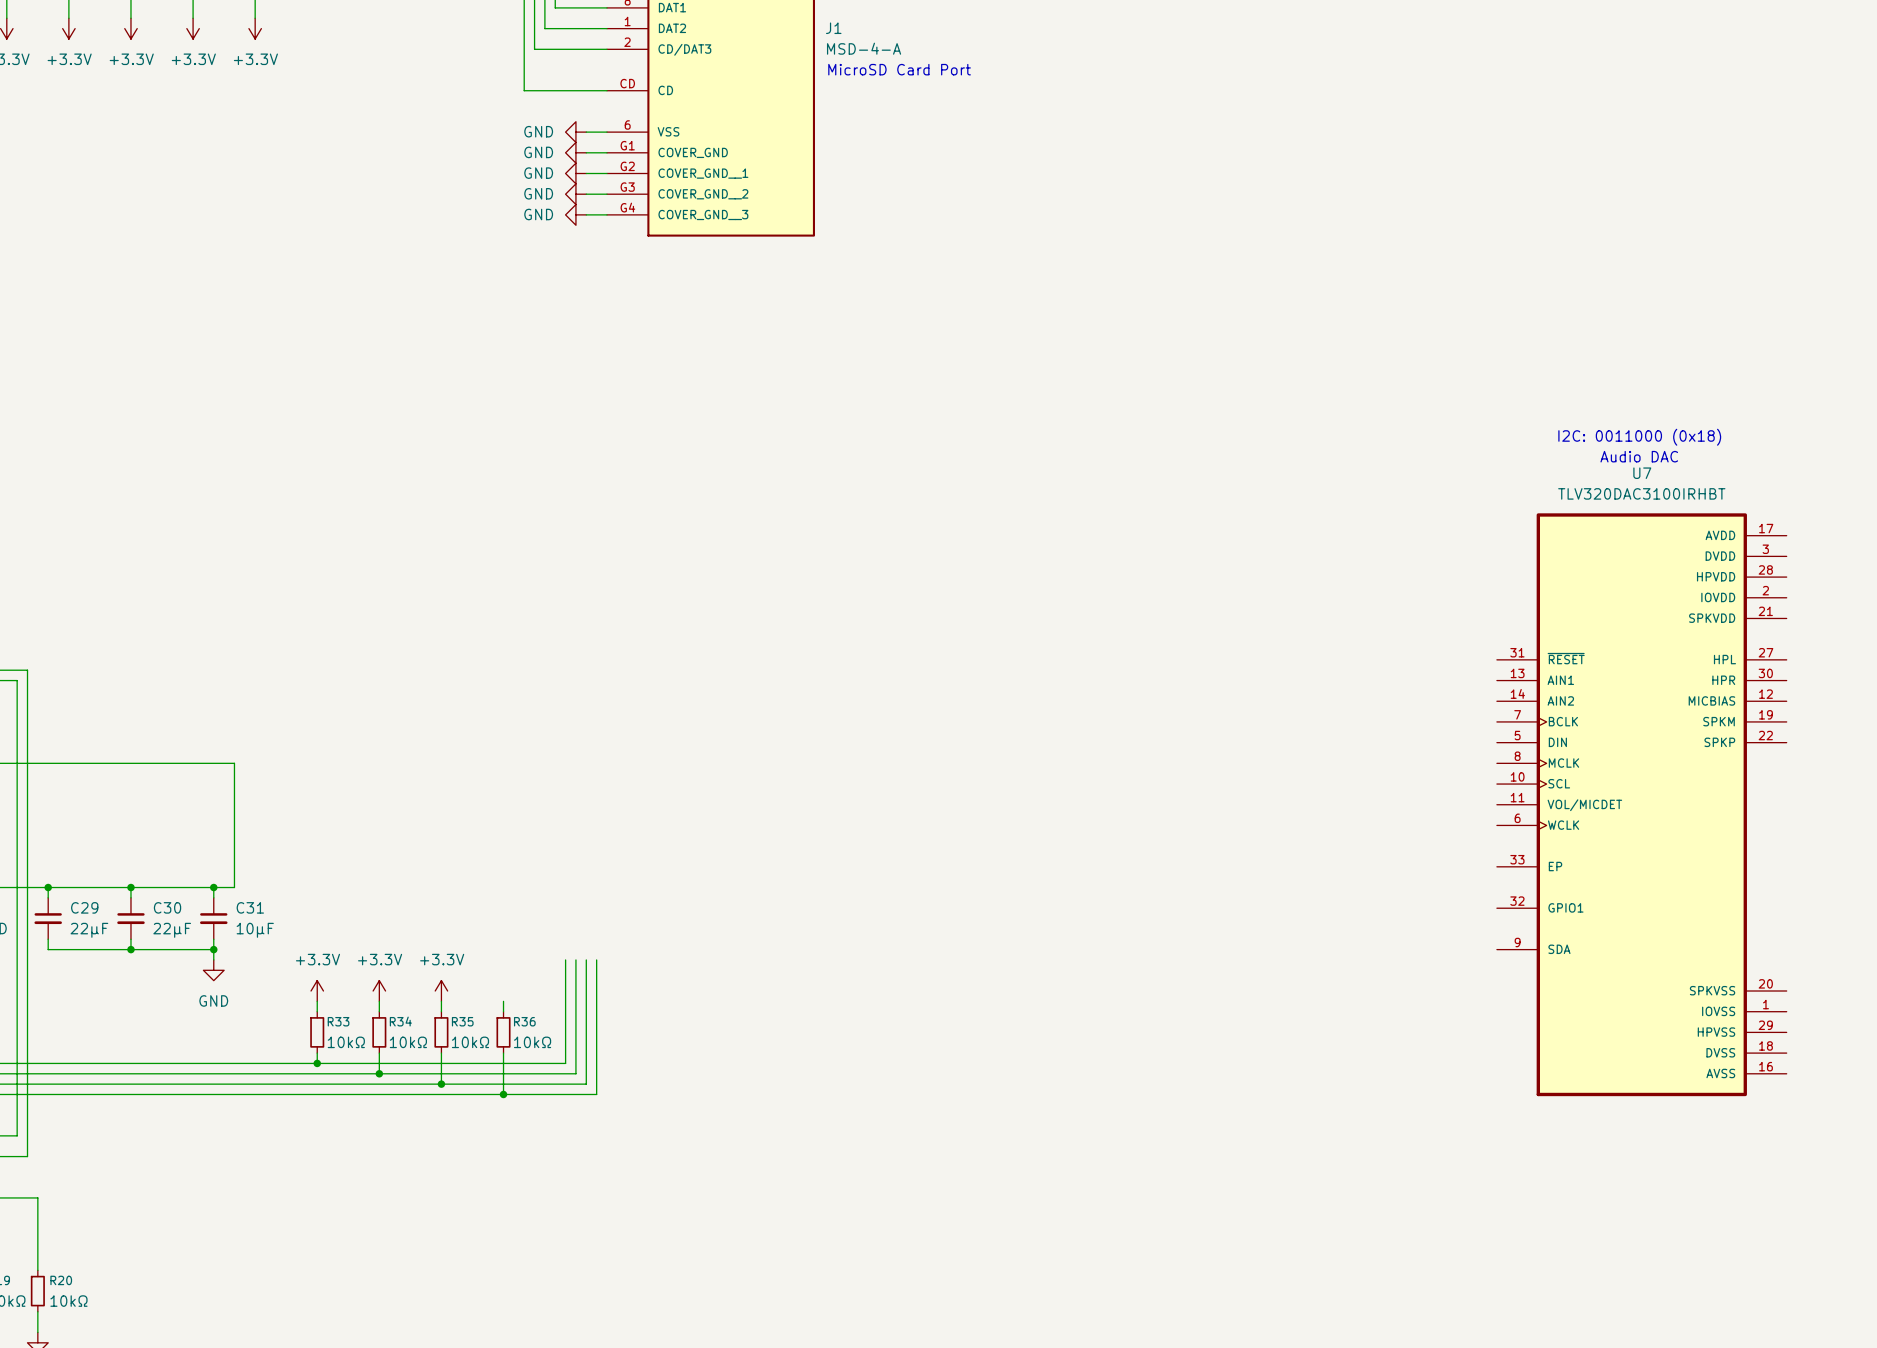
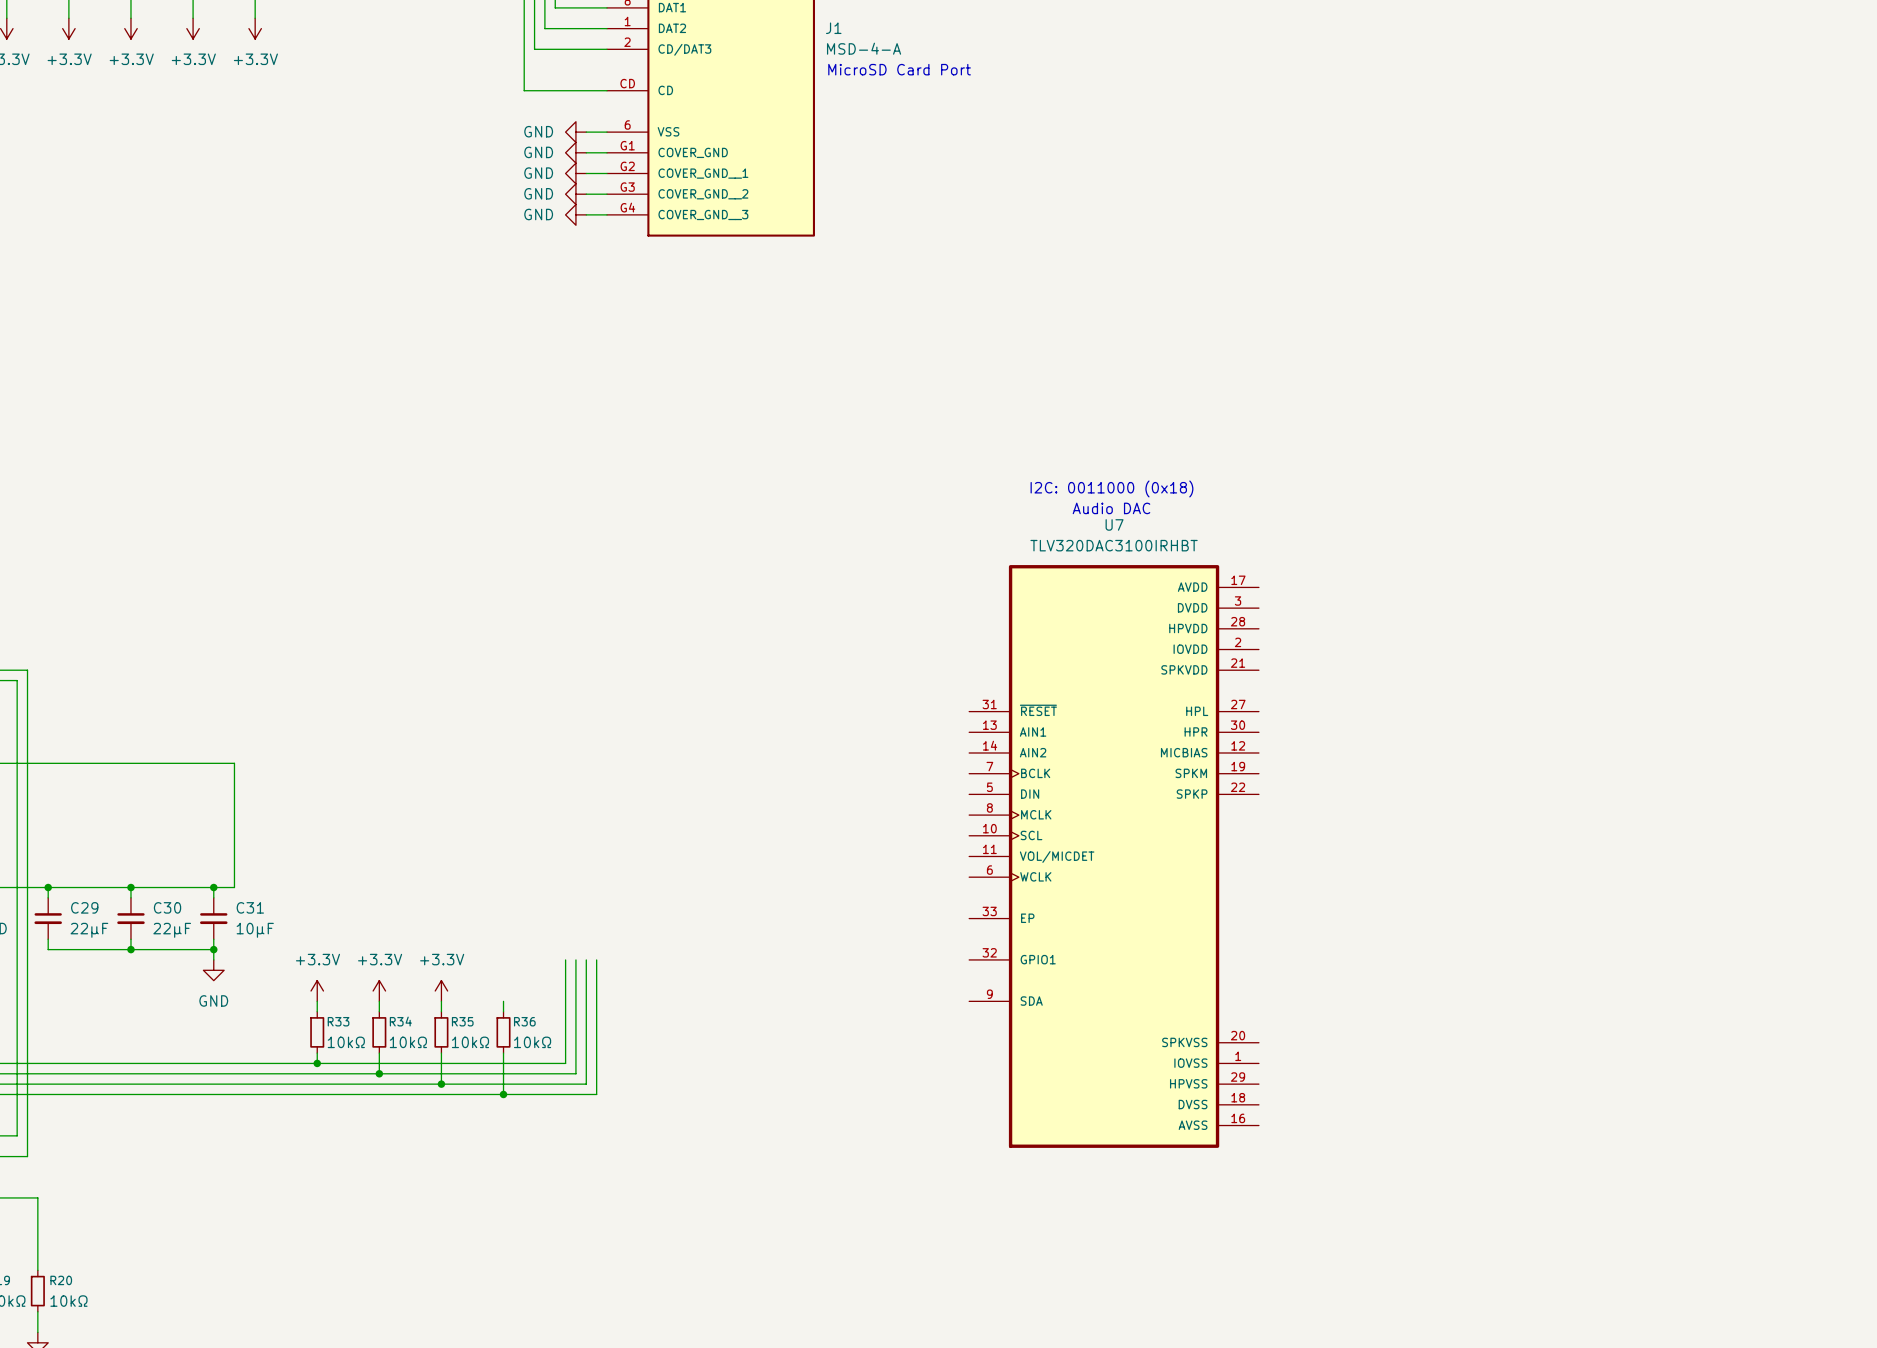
text: I2C: 0011000 (0x18) (1639, 437) -> none
text: Audio DAC (1639, 456) -> none
text: none -> I2C: 0011000 (0x18) (1111, 488)
text: none -> Audio DAC (1111, 508)
U7 position: (1641, 804) -> (1114, 856)

